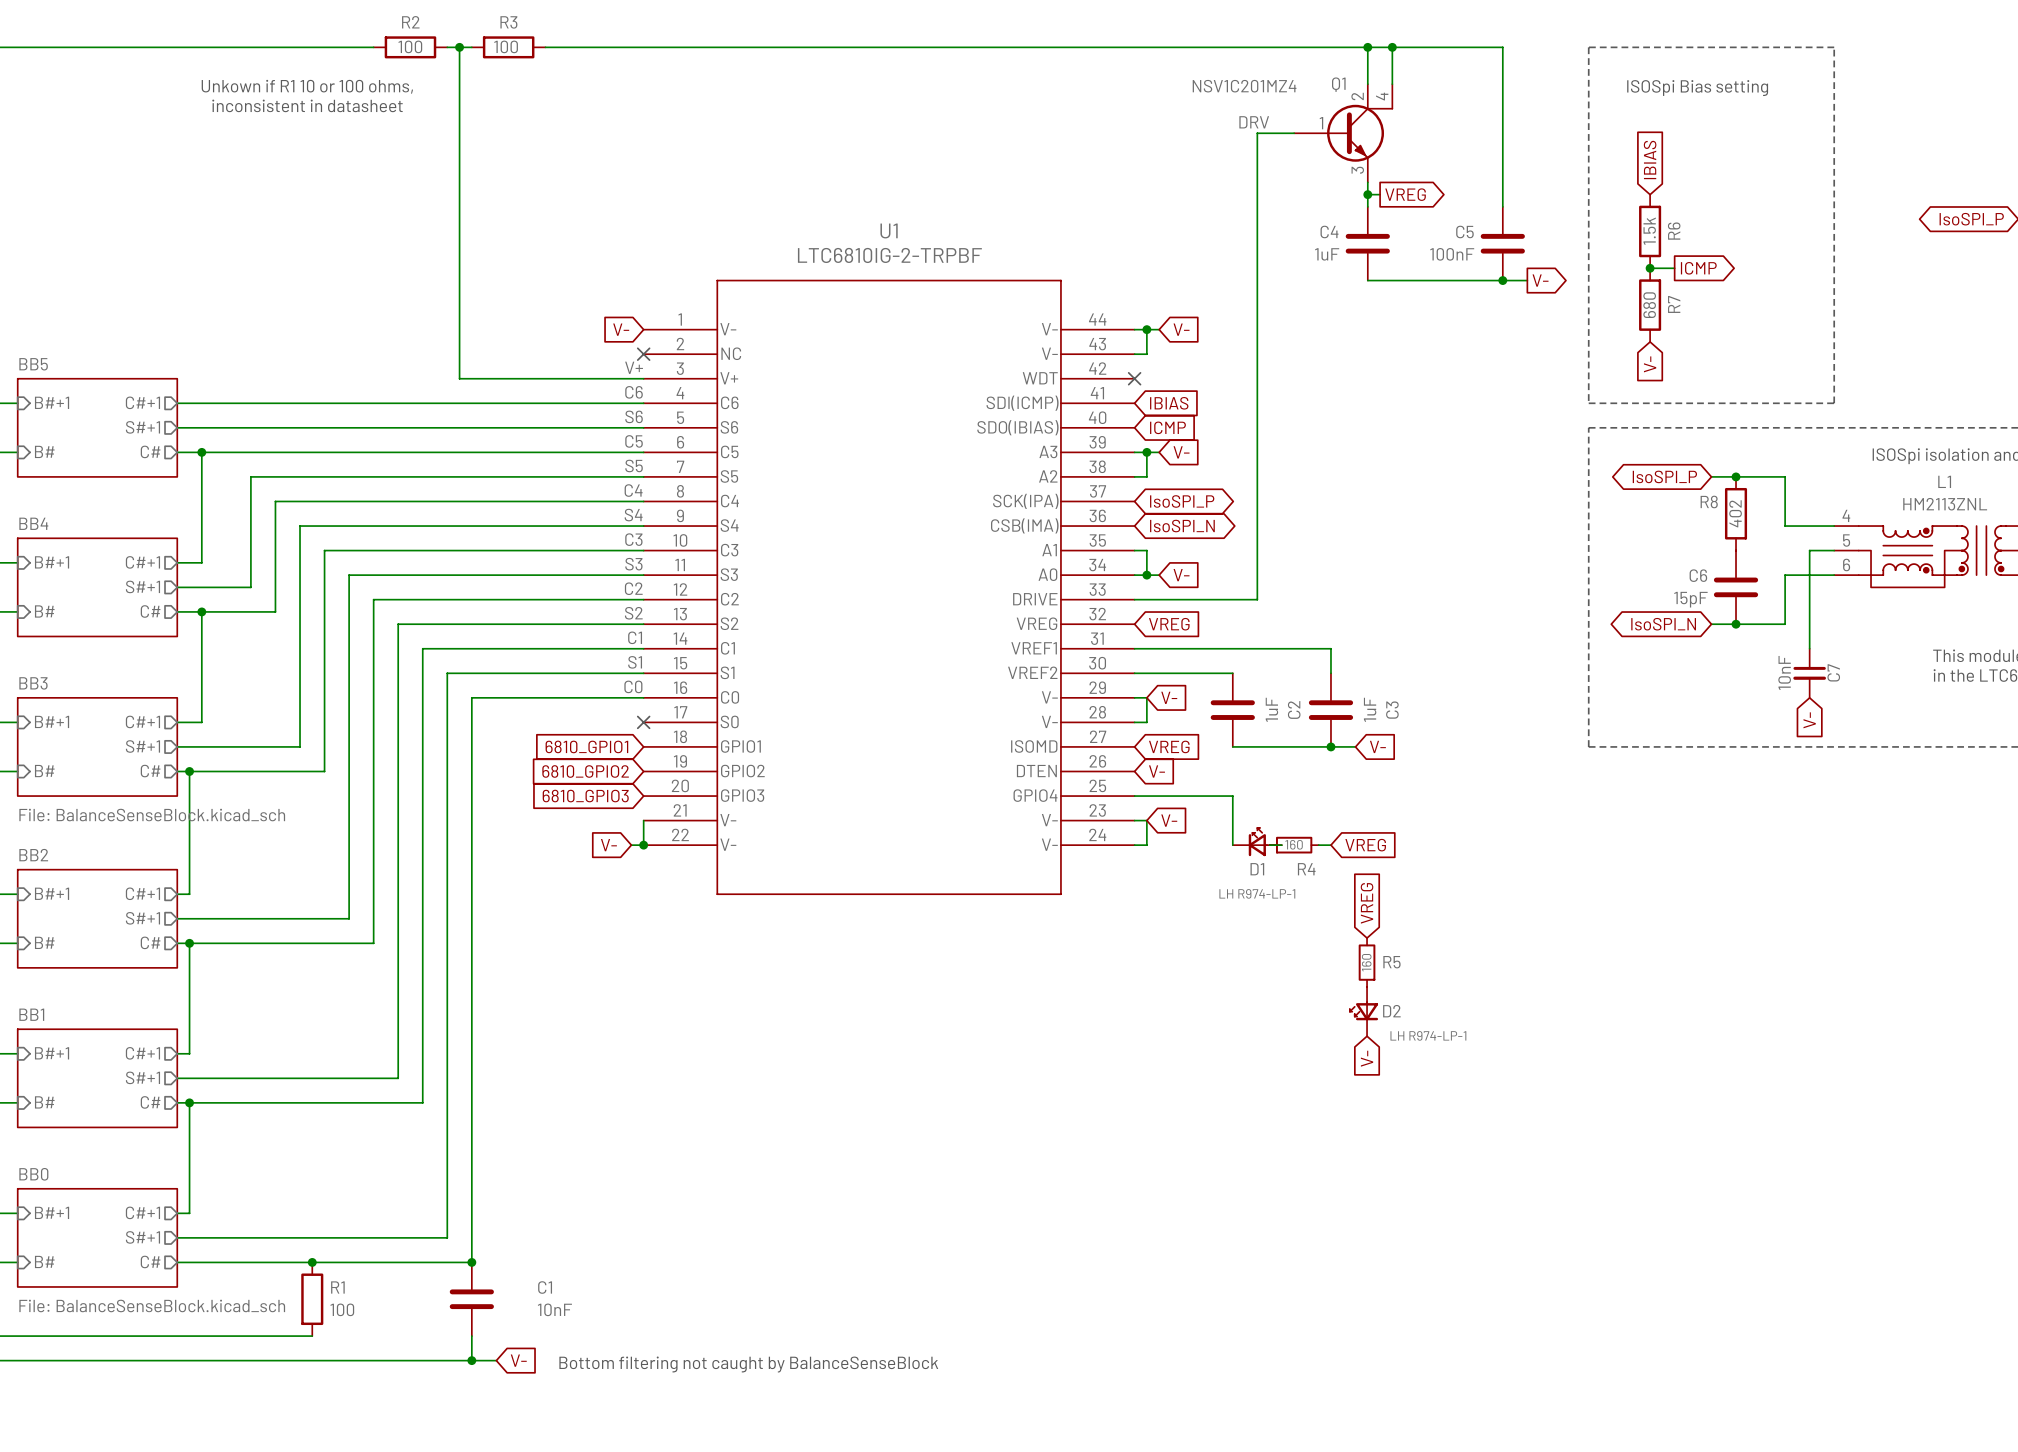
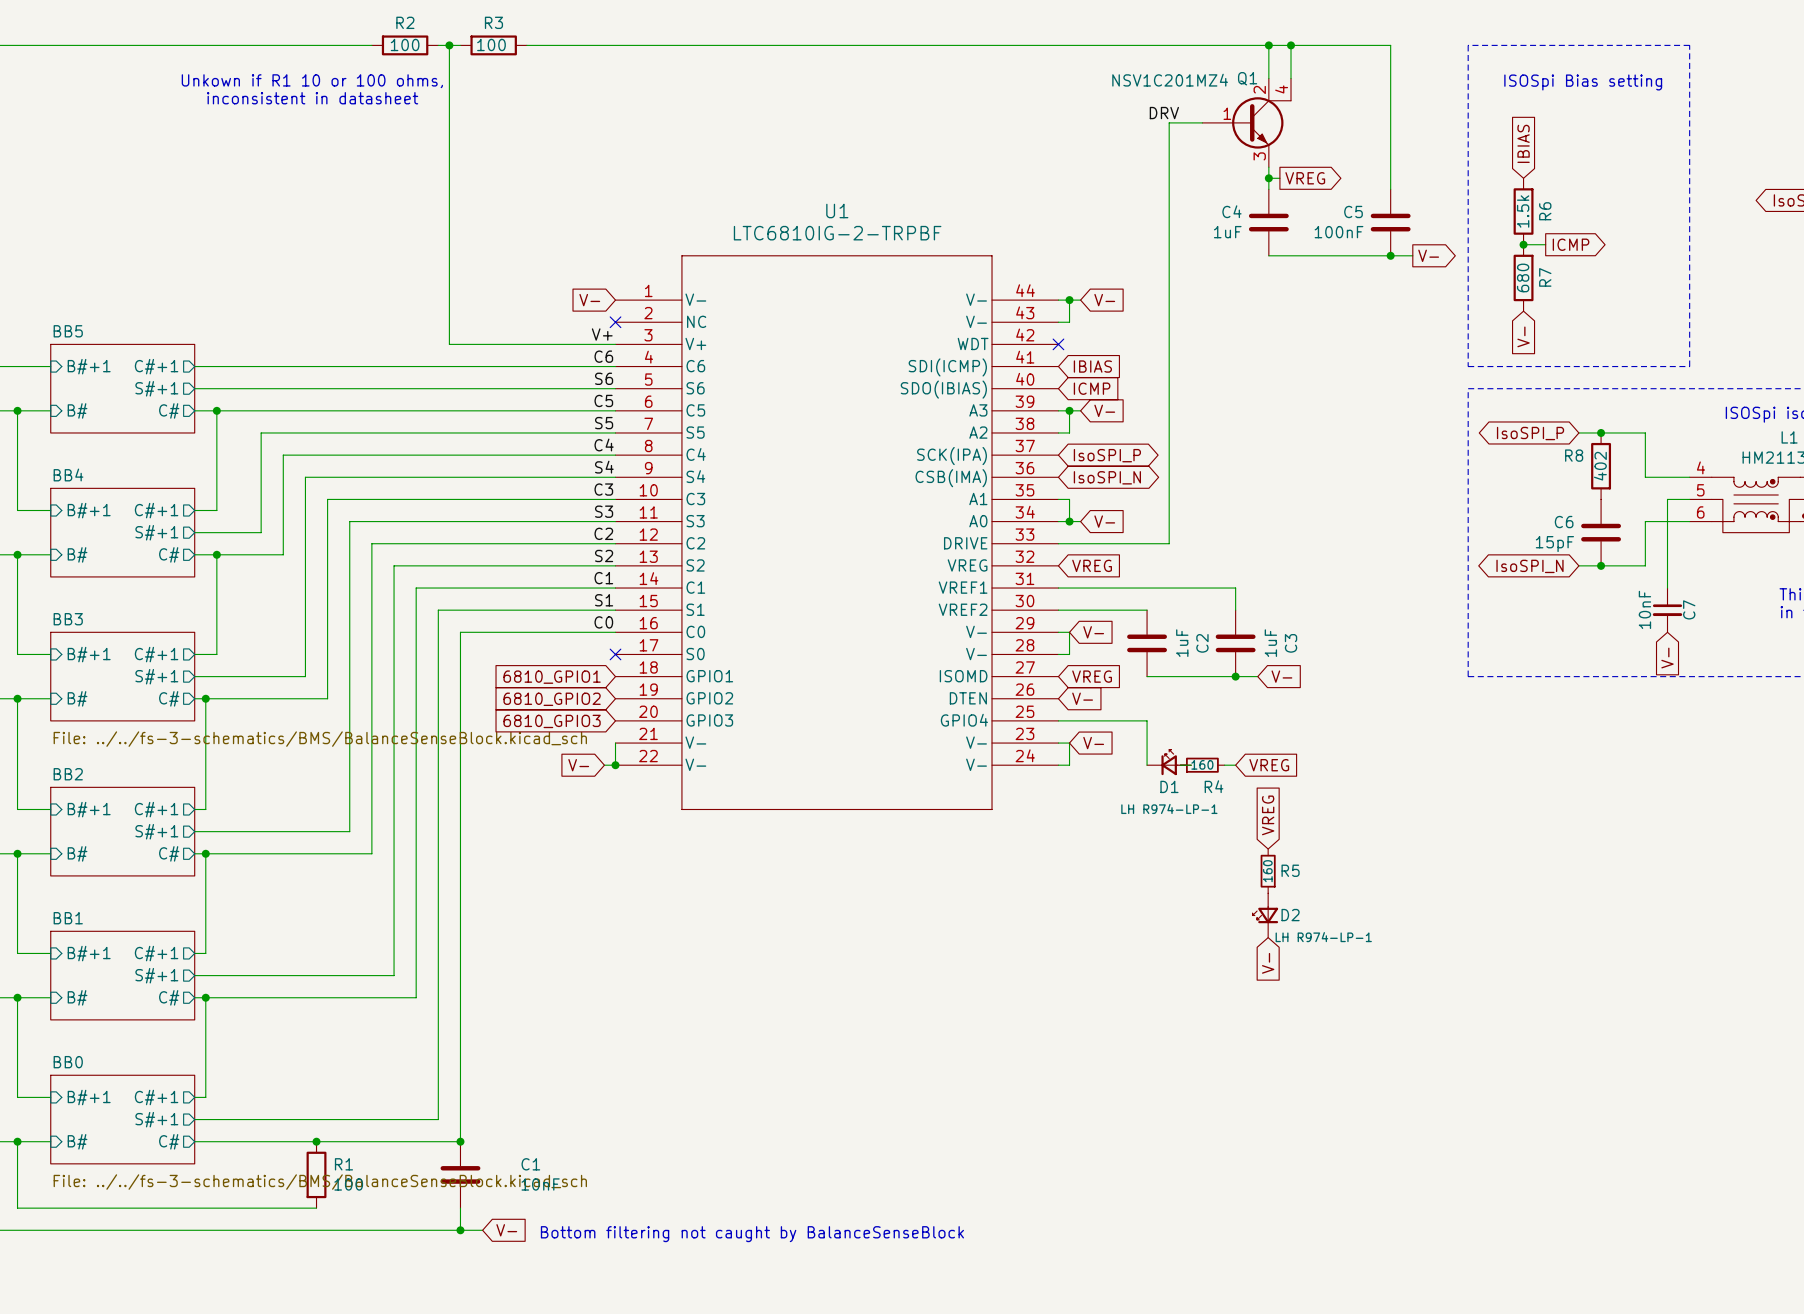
sheet BB5 value: File: BalanceSenseBlock.kicad_sch (152, 815) -> File: ../../fs-3-schematics/BMS/BalanceSenseBlock.kicad_sch (320, 739)
sheet BB2 value: File: BalanceSenseBlock.kicad_sch (152, 1305) -> File: ../../fs-3-schematics/BMS/BalanceSenseBlock.kicad_sch (320, 1182)

